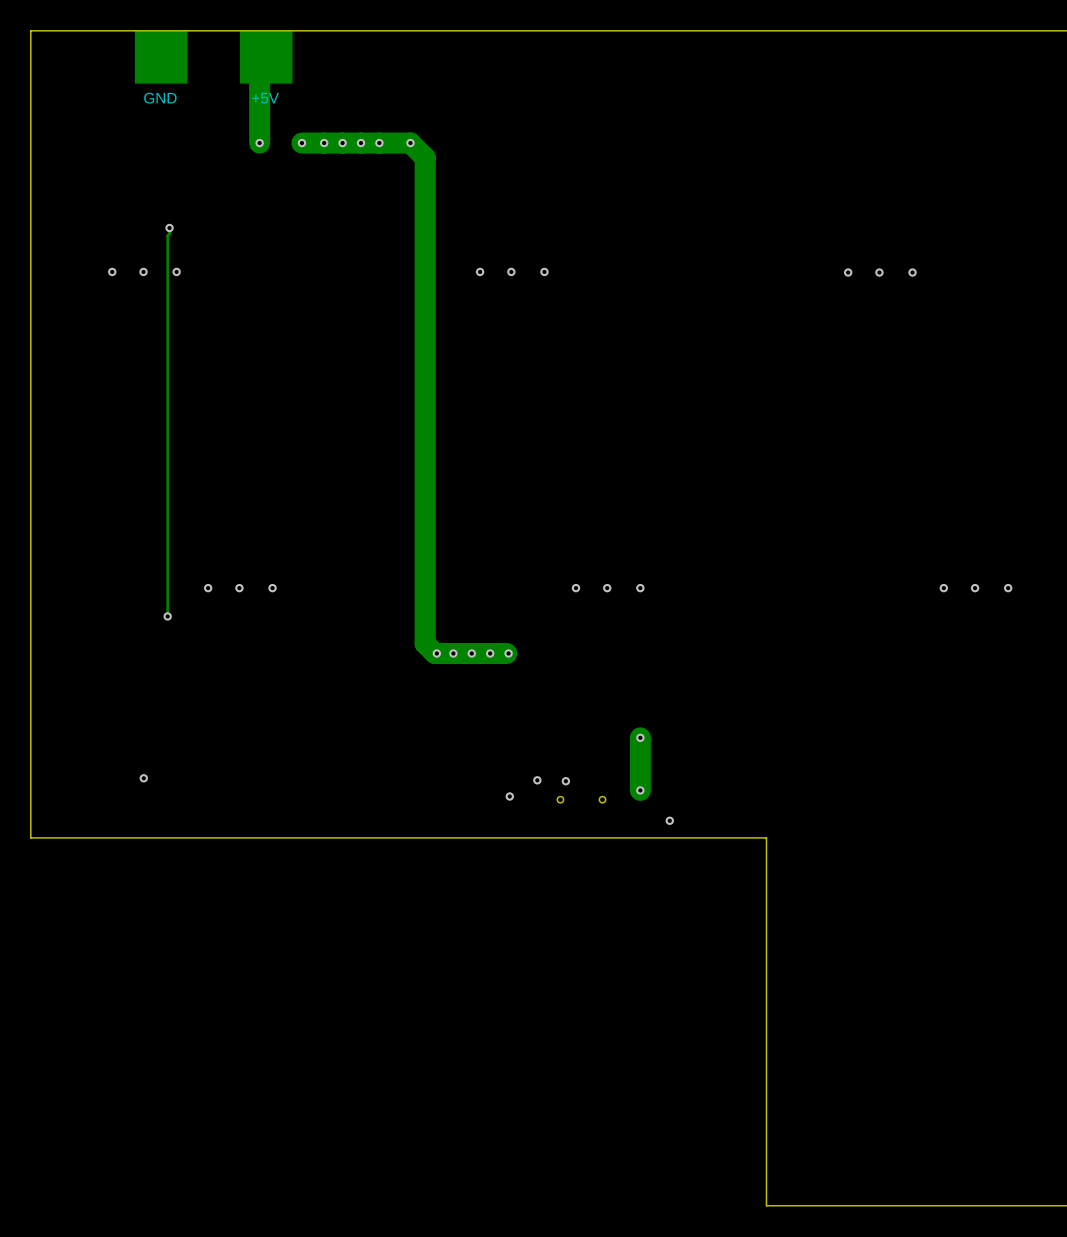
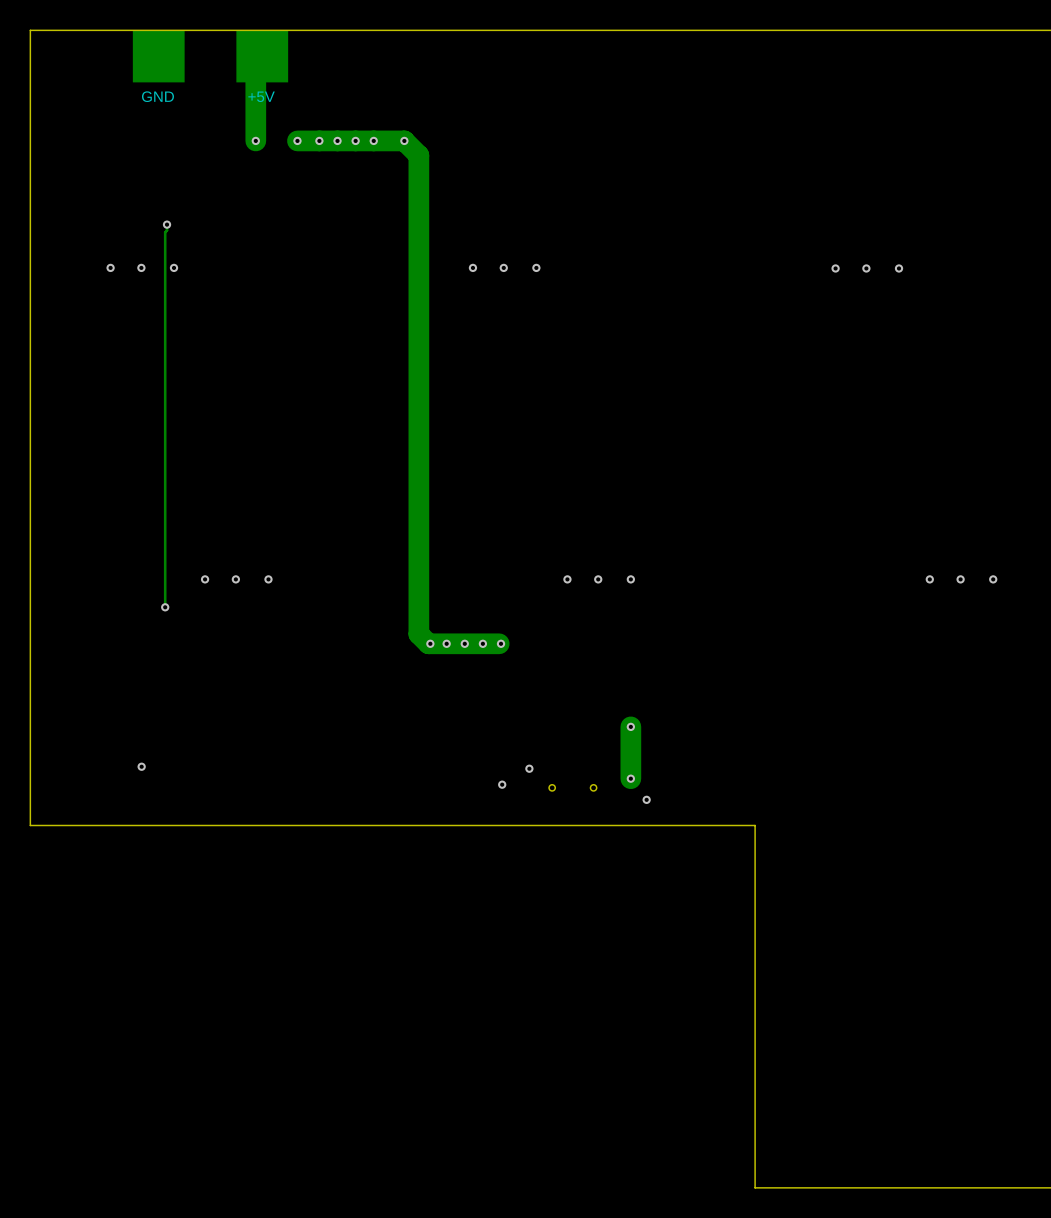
via: (565, 781) -> none
via position: (669, 820) -> (646, 799)

